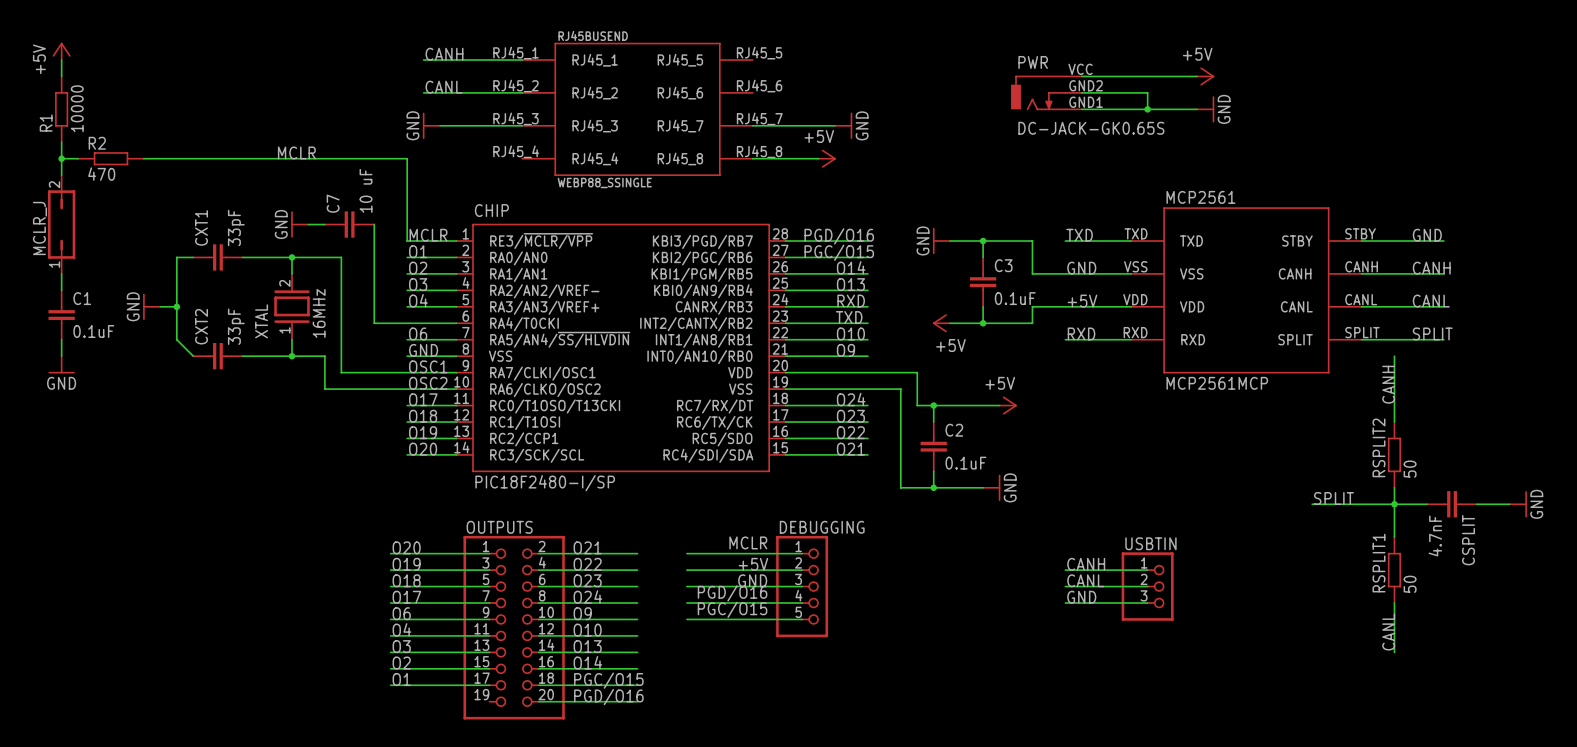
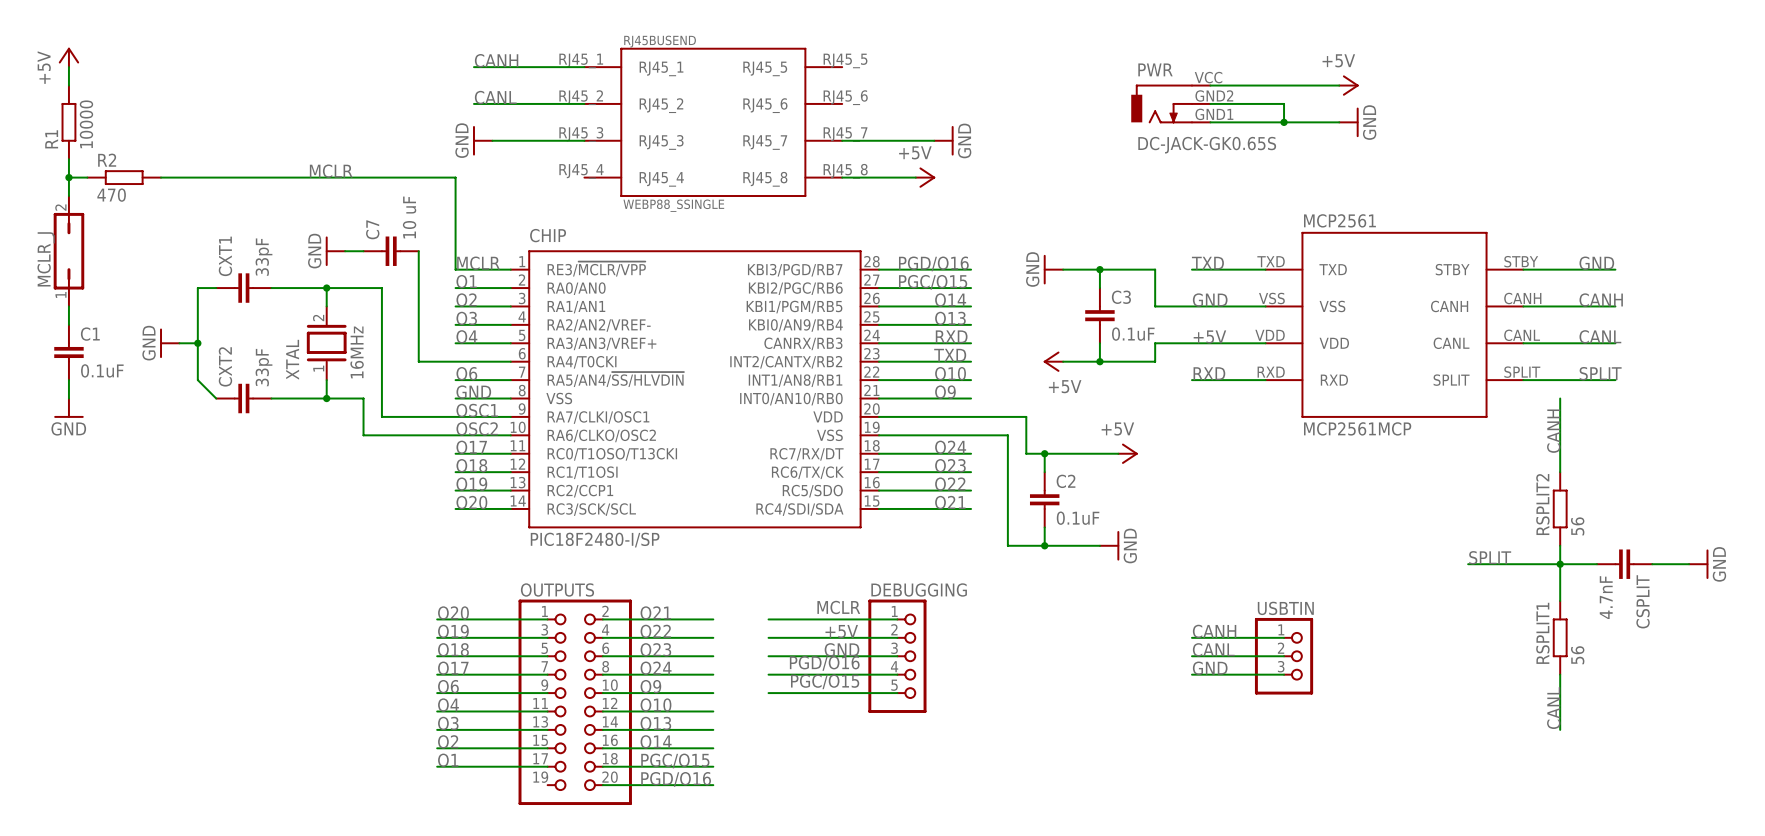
RSPLIT2 value: 50 (1410, 469) -> 56 (1577, 526)
RSPLIT1 value: 50 (1410, 584) -> 56 (1577, 655)

